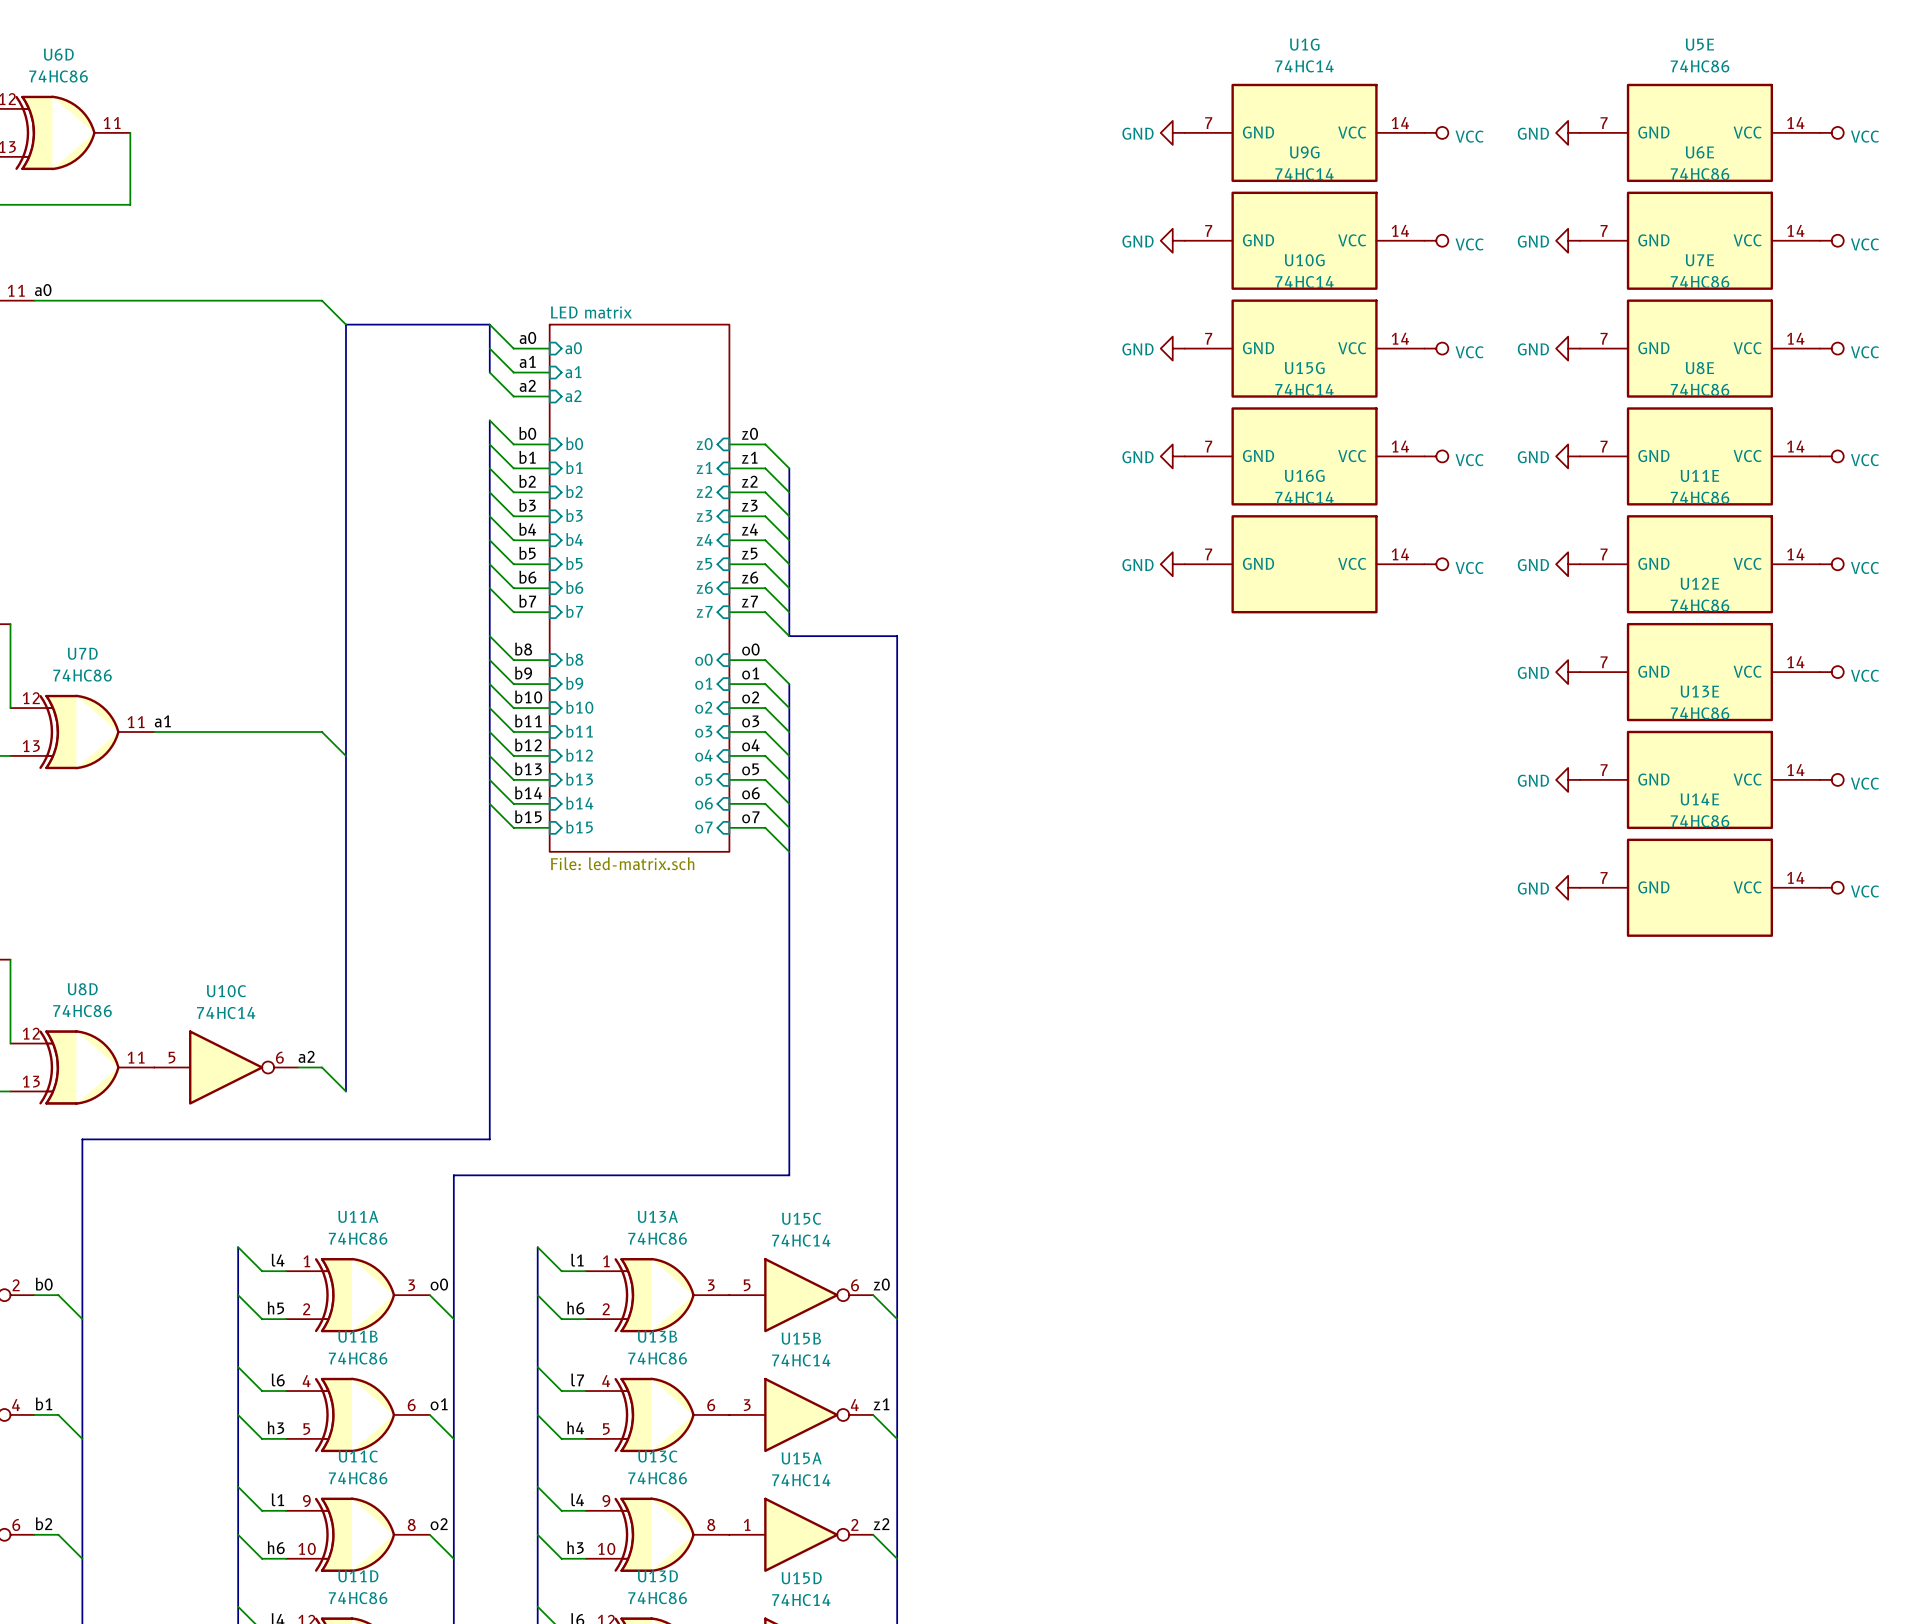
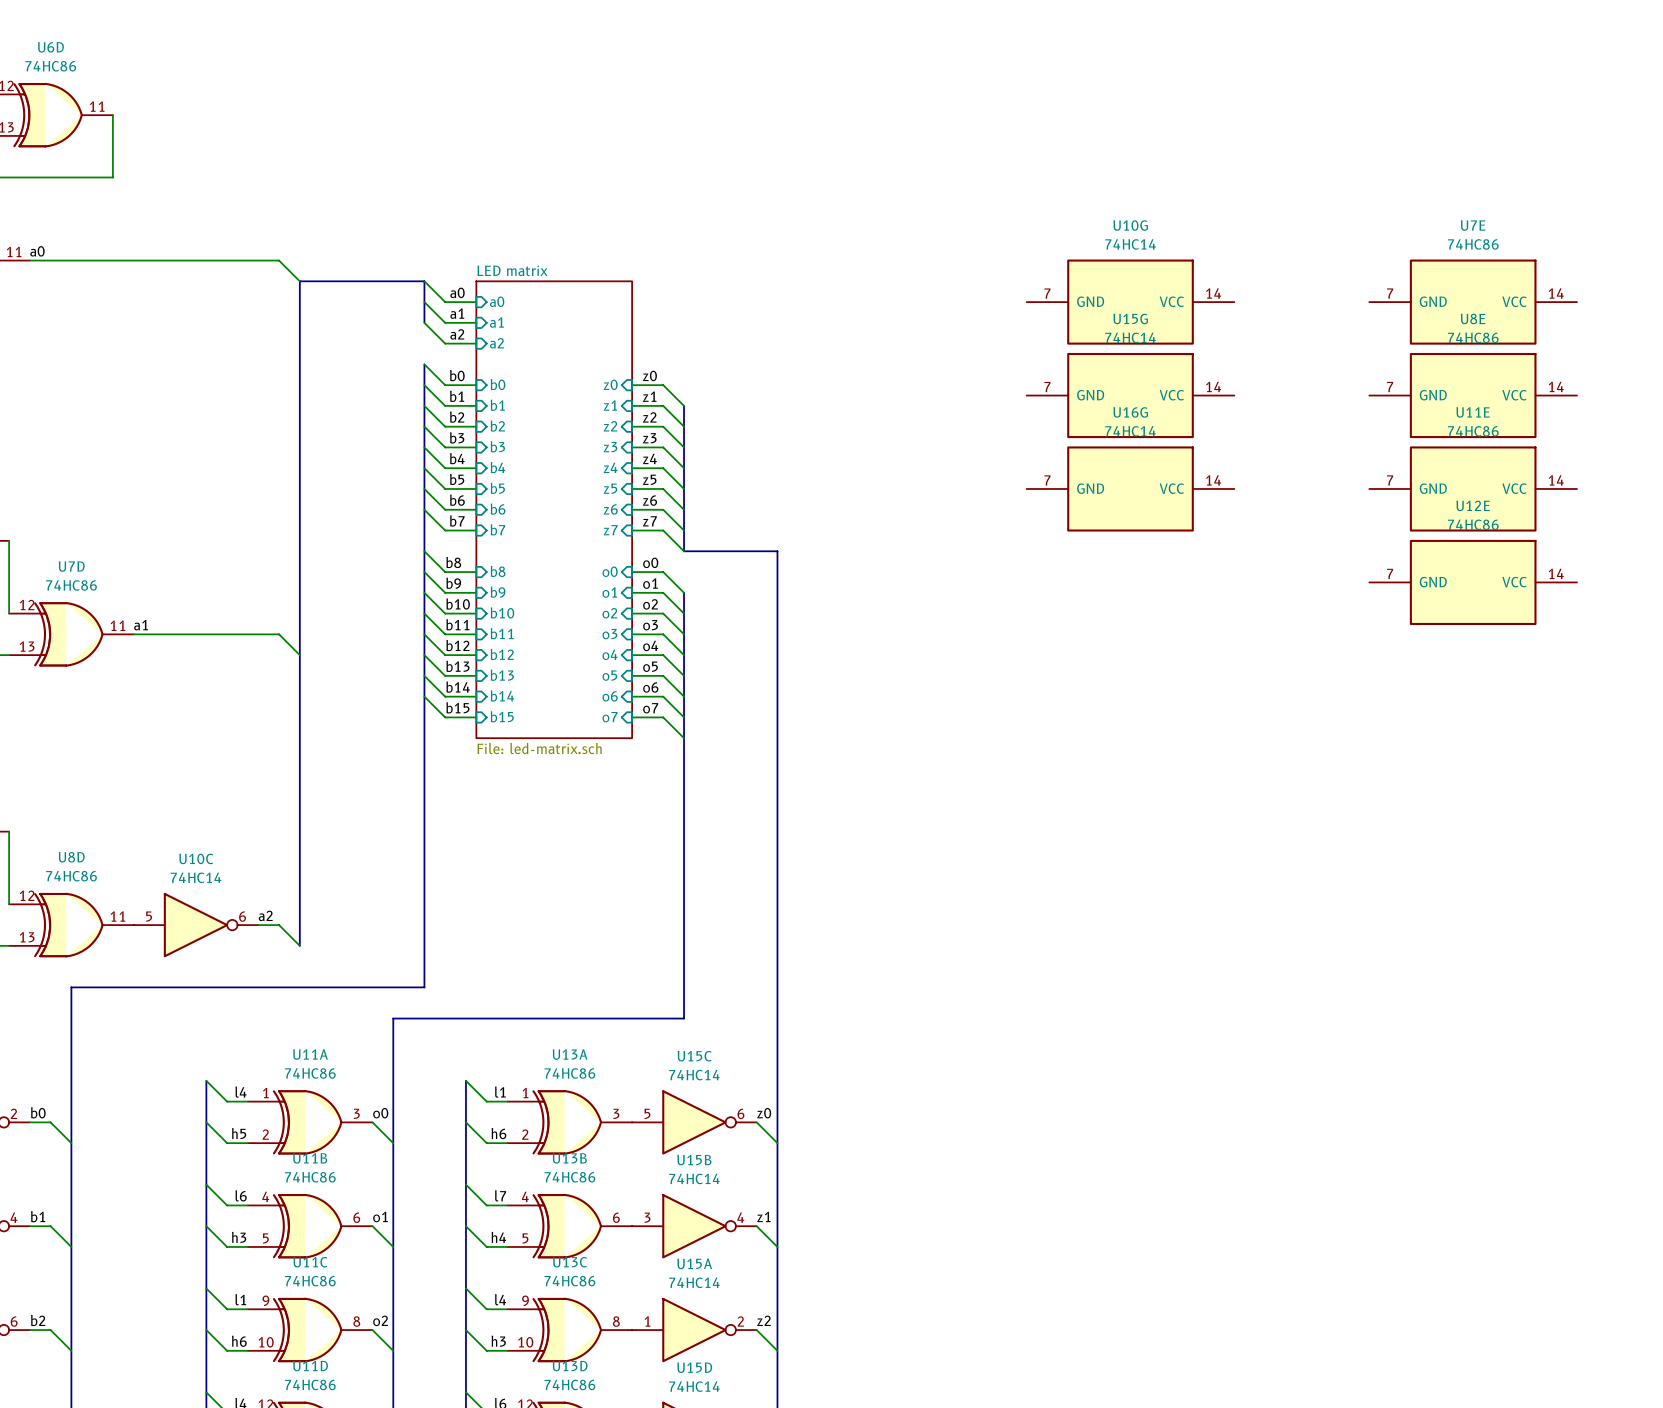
power symbol: GND (1172, 132) -> none
U1G: 74HC14 (1304, 132) -> none
power symbol: VCC (1436, 132) -> none
power symbol: GND (1568, 132) -> none
U5E: 74HC86 (1699, 132) -> none
power symbol: VCC (1831, 132) -> none
power symbol: GND (1172, 240) -> none
U9G: 74HC14 (1304, 240) -> none
power symbol: VCC (1436, 240) -> none
power symbol: GND (1568, 240) -> none
U6E: 74HC86 (1699, 240) -> none
power symbol: VCC (1831, 240) -> none
power symbol: GND (1172, 348) -> none
power symbol: VCC (1436, 348) -> none
power symbol: GND (1568, 348) -> none
power symbol: VCC (1831, 348) -> none
power symbol: GND (1172, 456) -> none
power symbol: VCC (1436, 456) -> none
power symbol: GND (1568, 456) -> none
power symbol: VCC (1831, 456) -> none
power symbol: GND (1172, 564) -> none
power symbol: VCC (1436, 564) -> none
power symbol: GND (1568, 564) -> none
power symbol: VCC (1831, 564) -> none
power symbol: GND (1568, 672) -> none
power symbol: VCC (1831, 672) -> none
power symbol: GND (1568, 779) -> none
U13E: 74HC86 (1699, 779) -> none
power symbol: VCC (1831, 779) -> none
power symbol: GND (1568, 887) -> none
U14E: 74HC86 (1699, 887) -> none
power symbol: VCC (1831, 887) -> none

